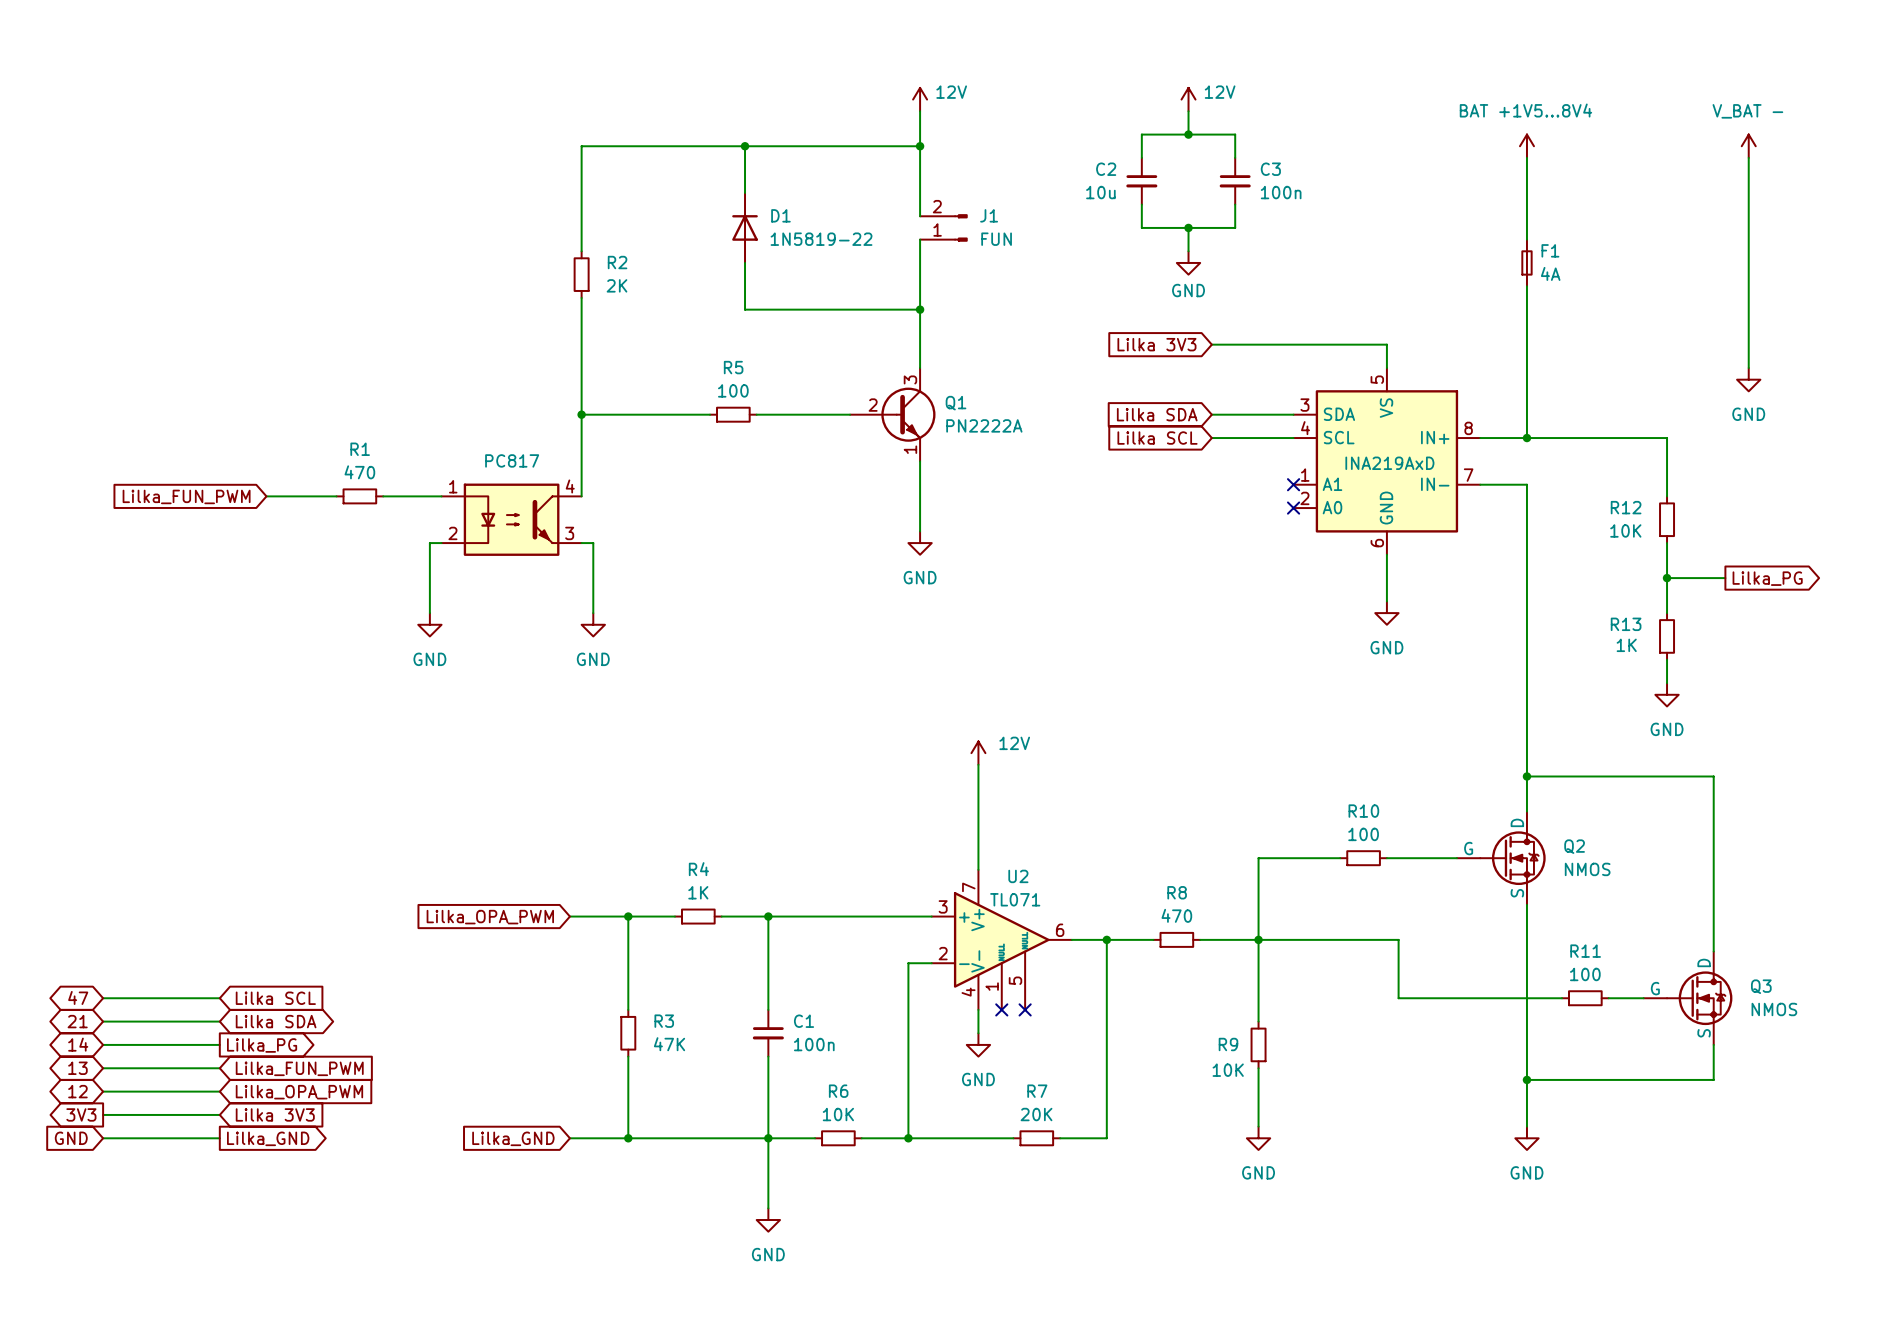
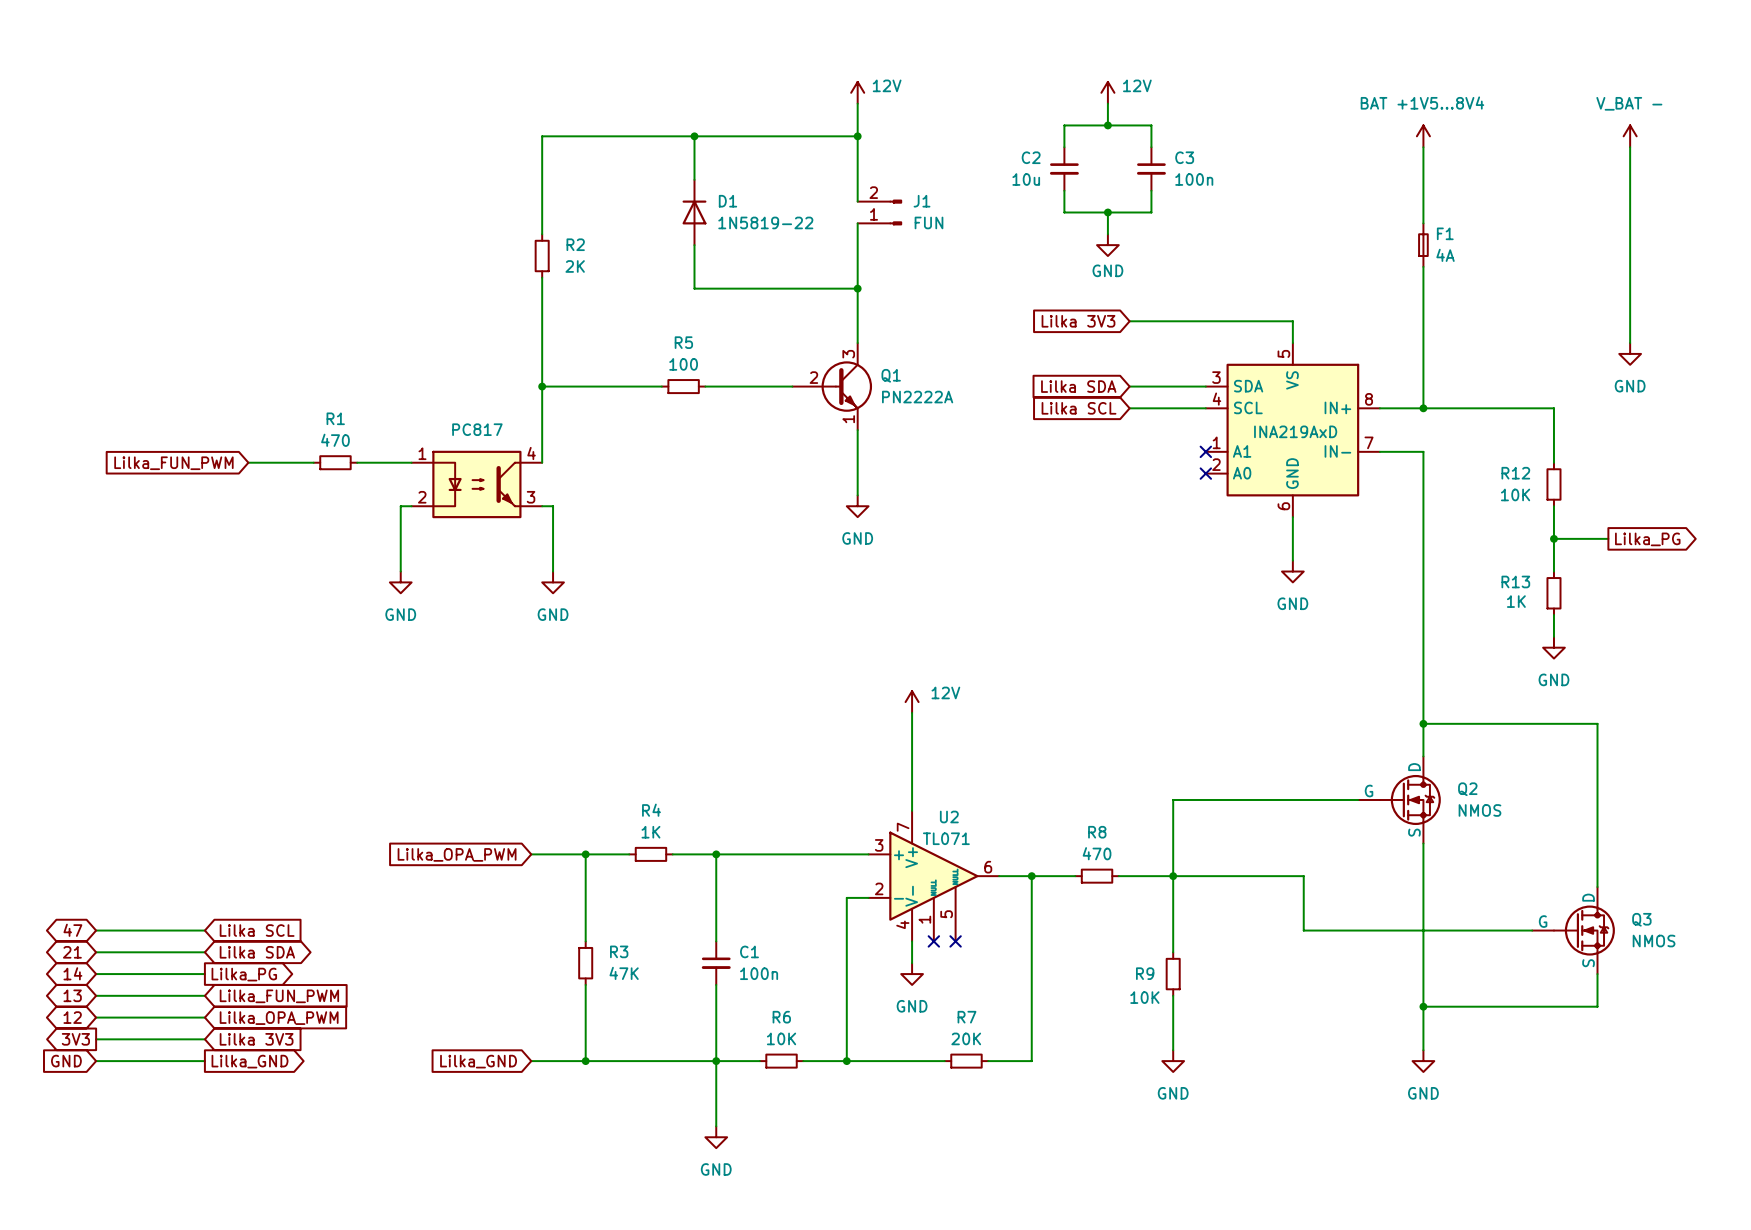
wire: none -> (1249, 799) (1292, 799)
R10: 100 (1363, 858) -> none
wire: none -> (1456, 930) (1499, 930)
R11: 100 (1585, 998) -> none

